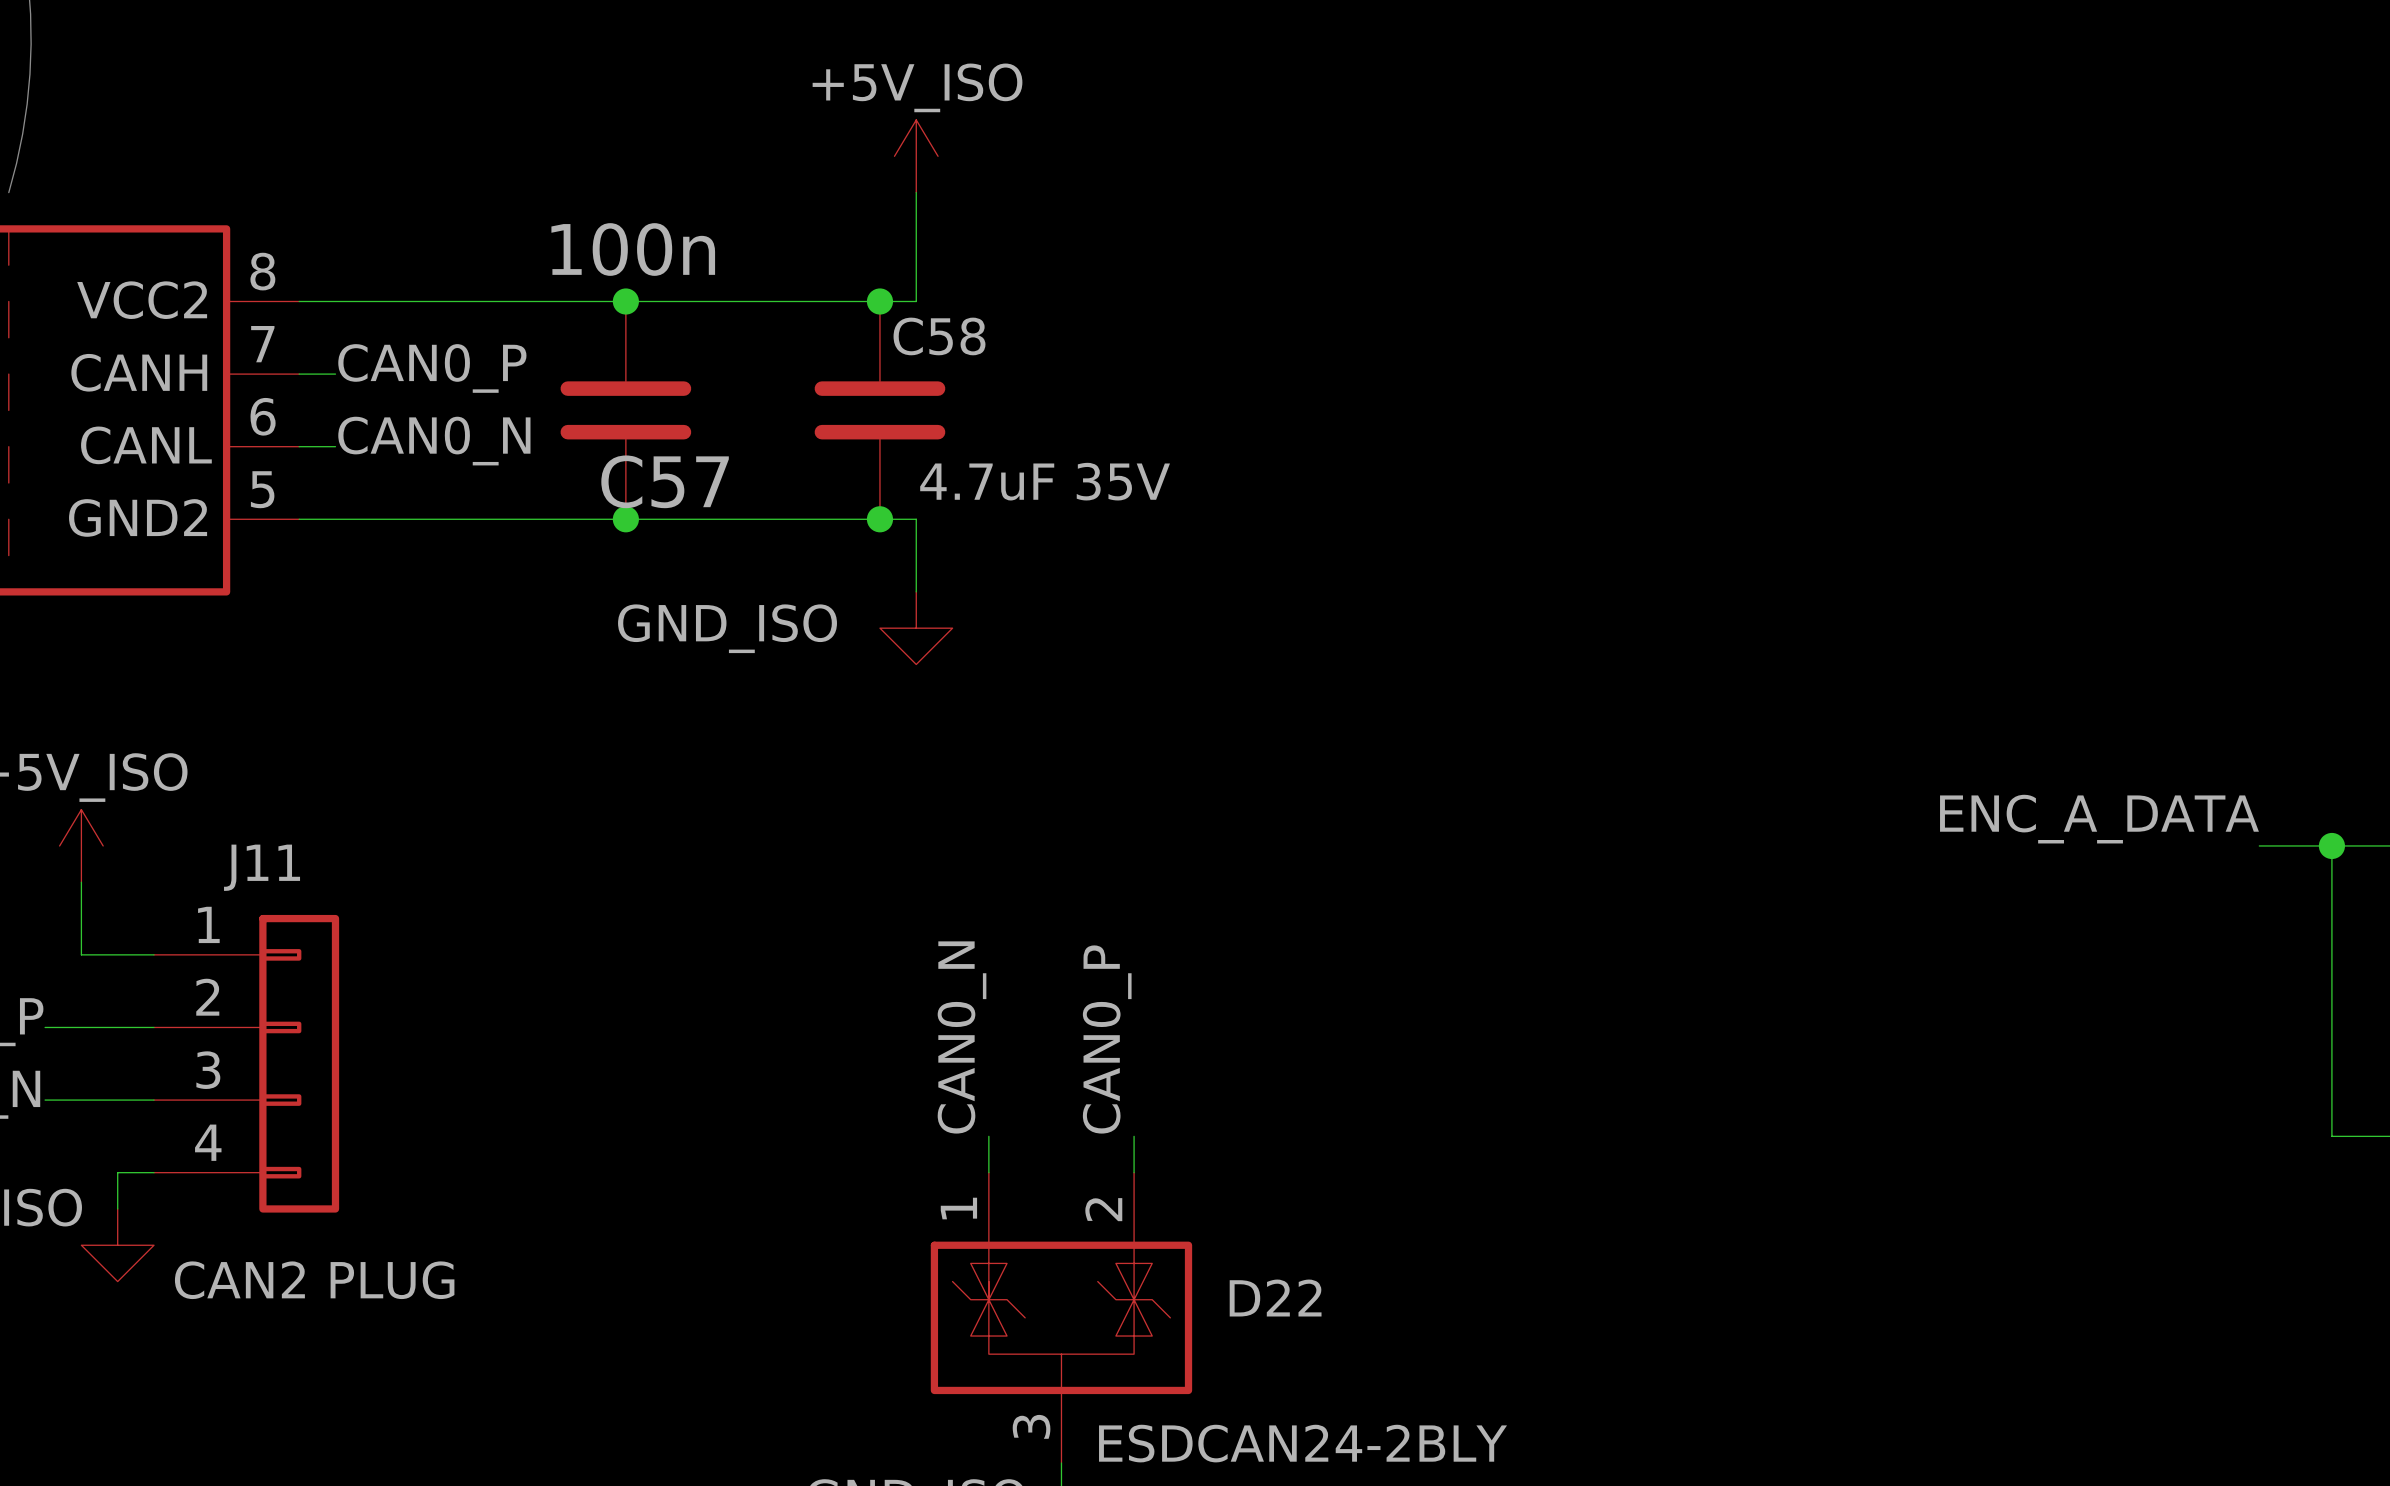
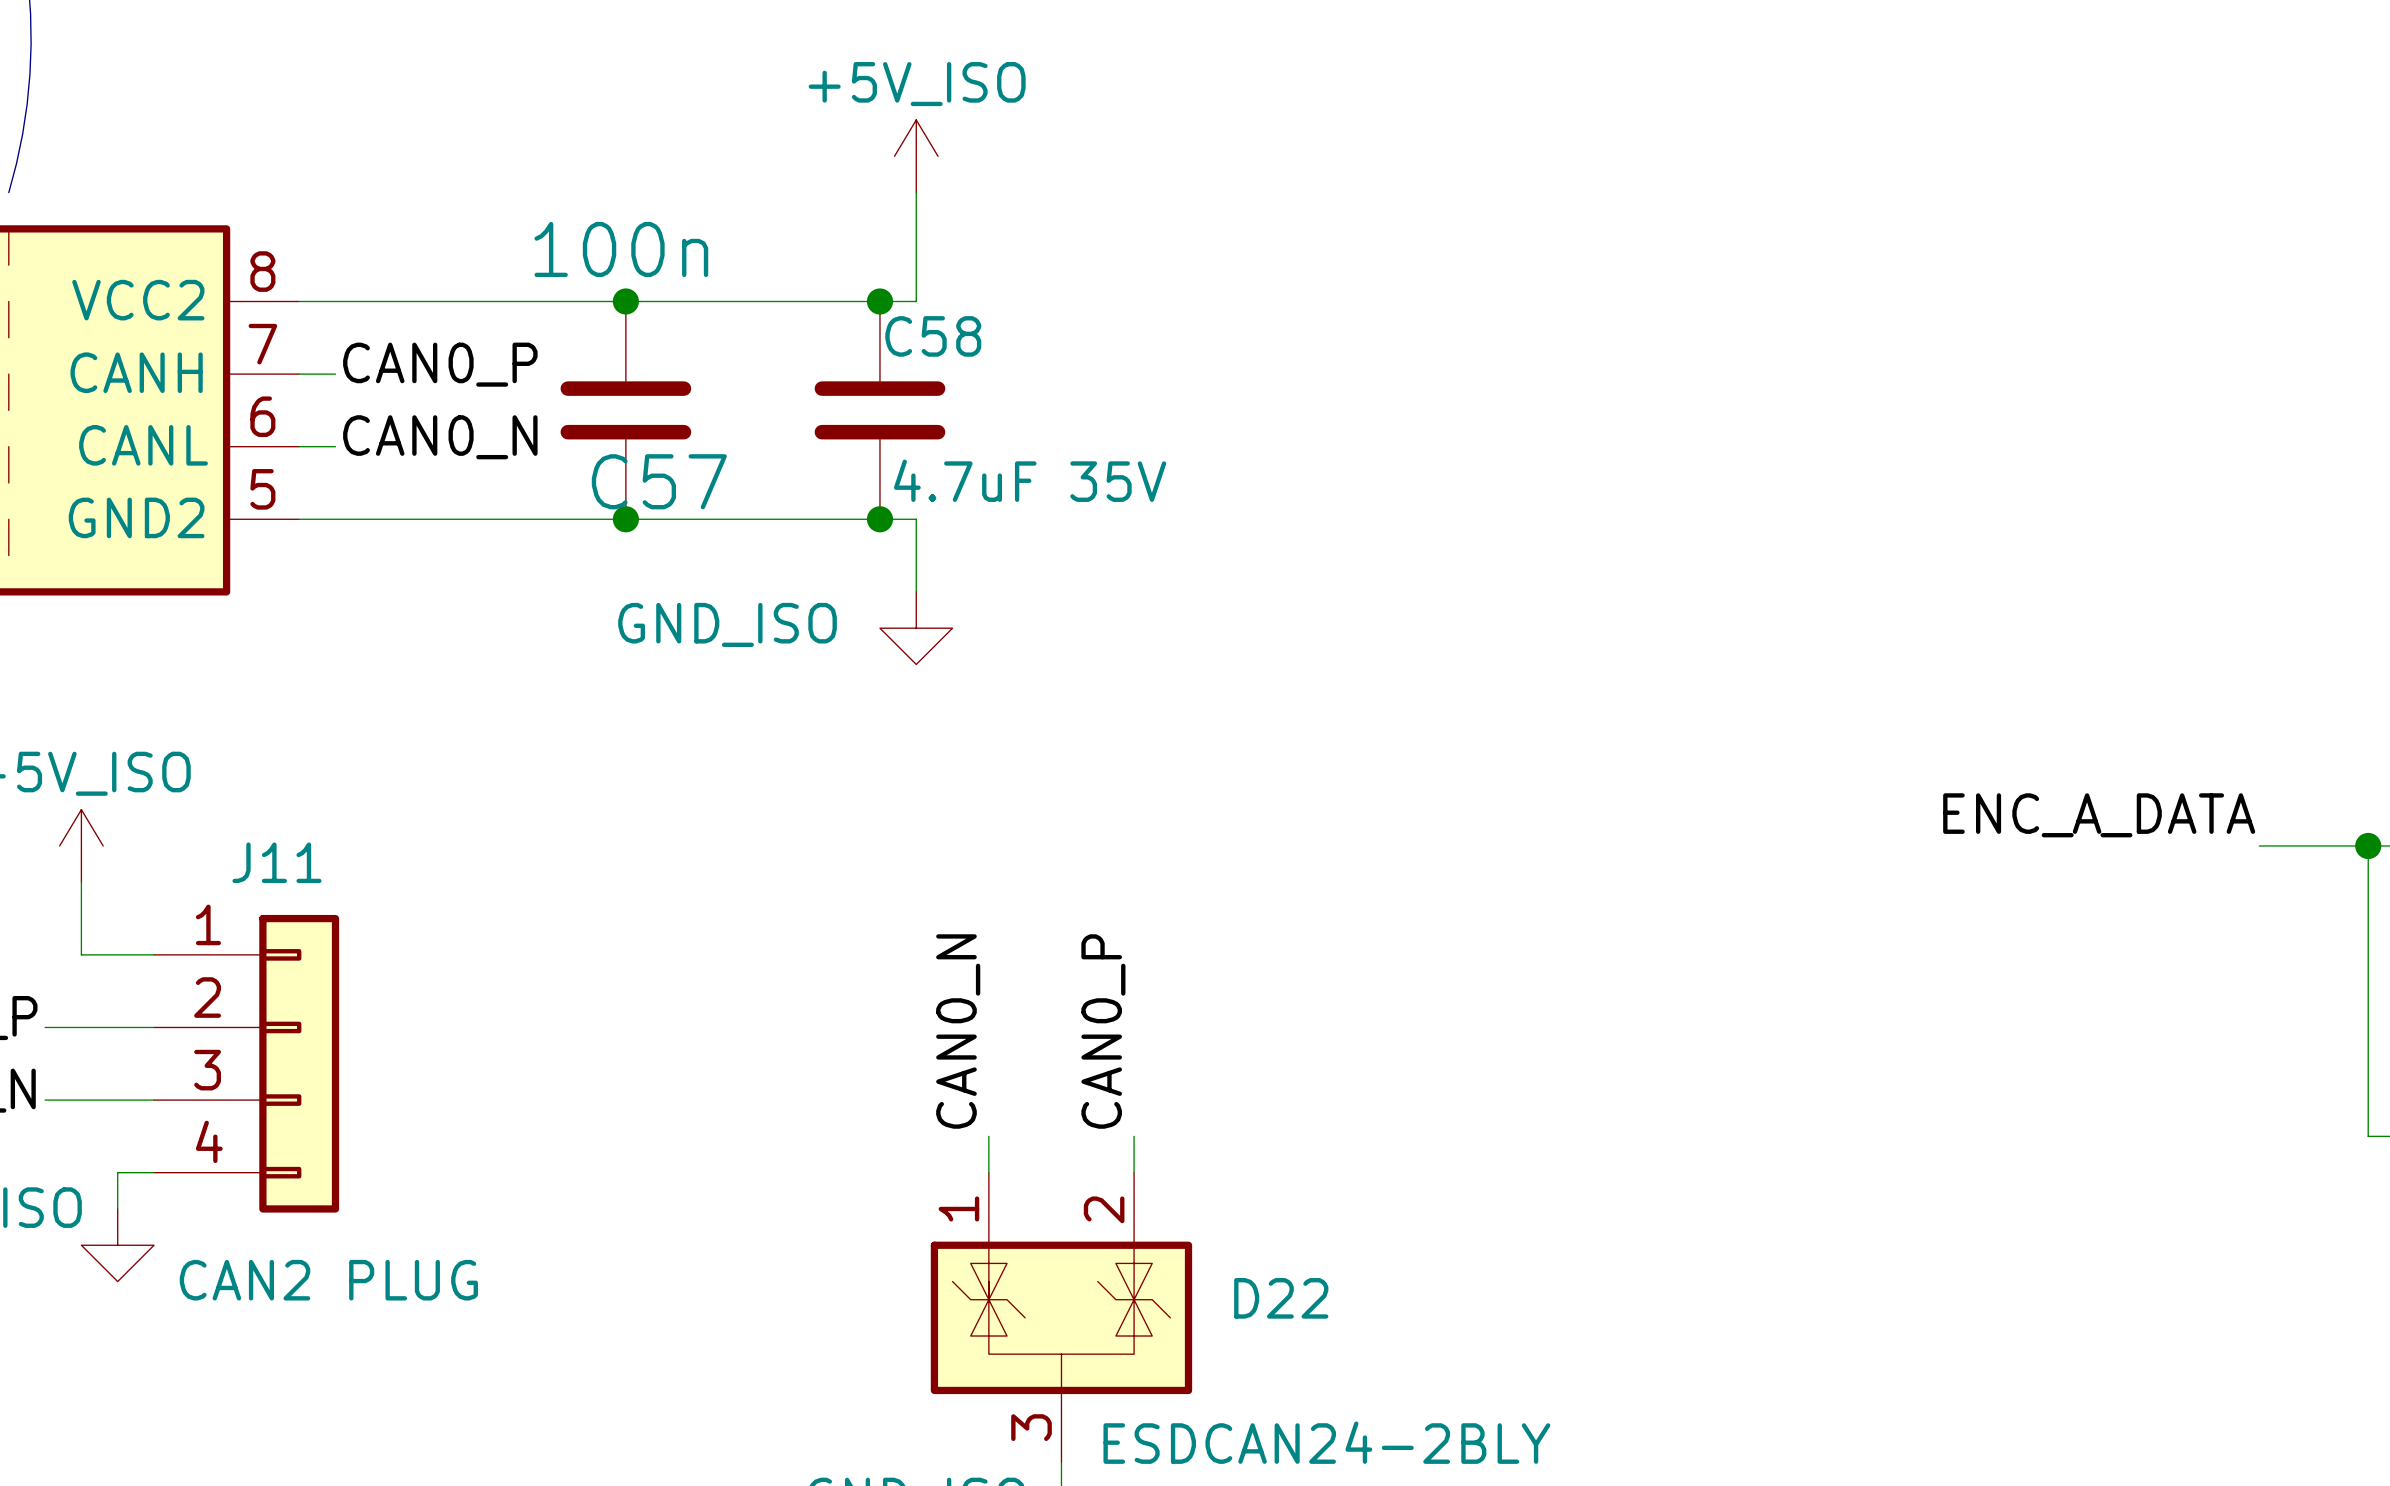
wire: (2331, 845) (2331, 1136) (2368, 1136) -> (2368, 845) (2368, 1136)
junction position: (2331, 845) -> (2368, 845)

